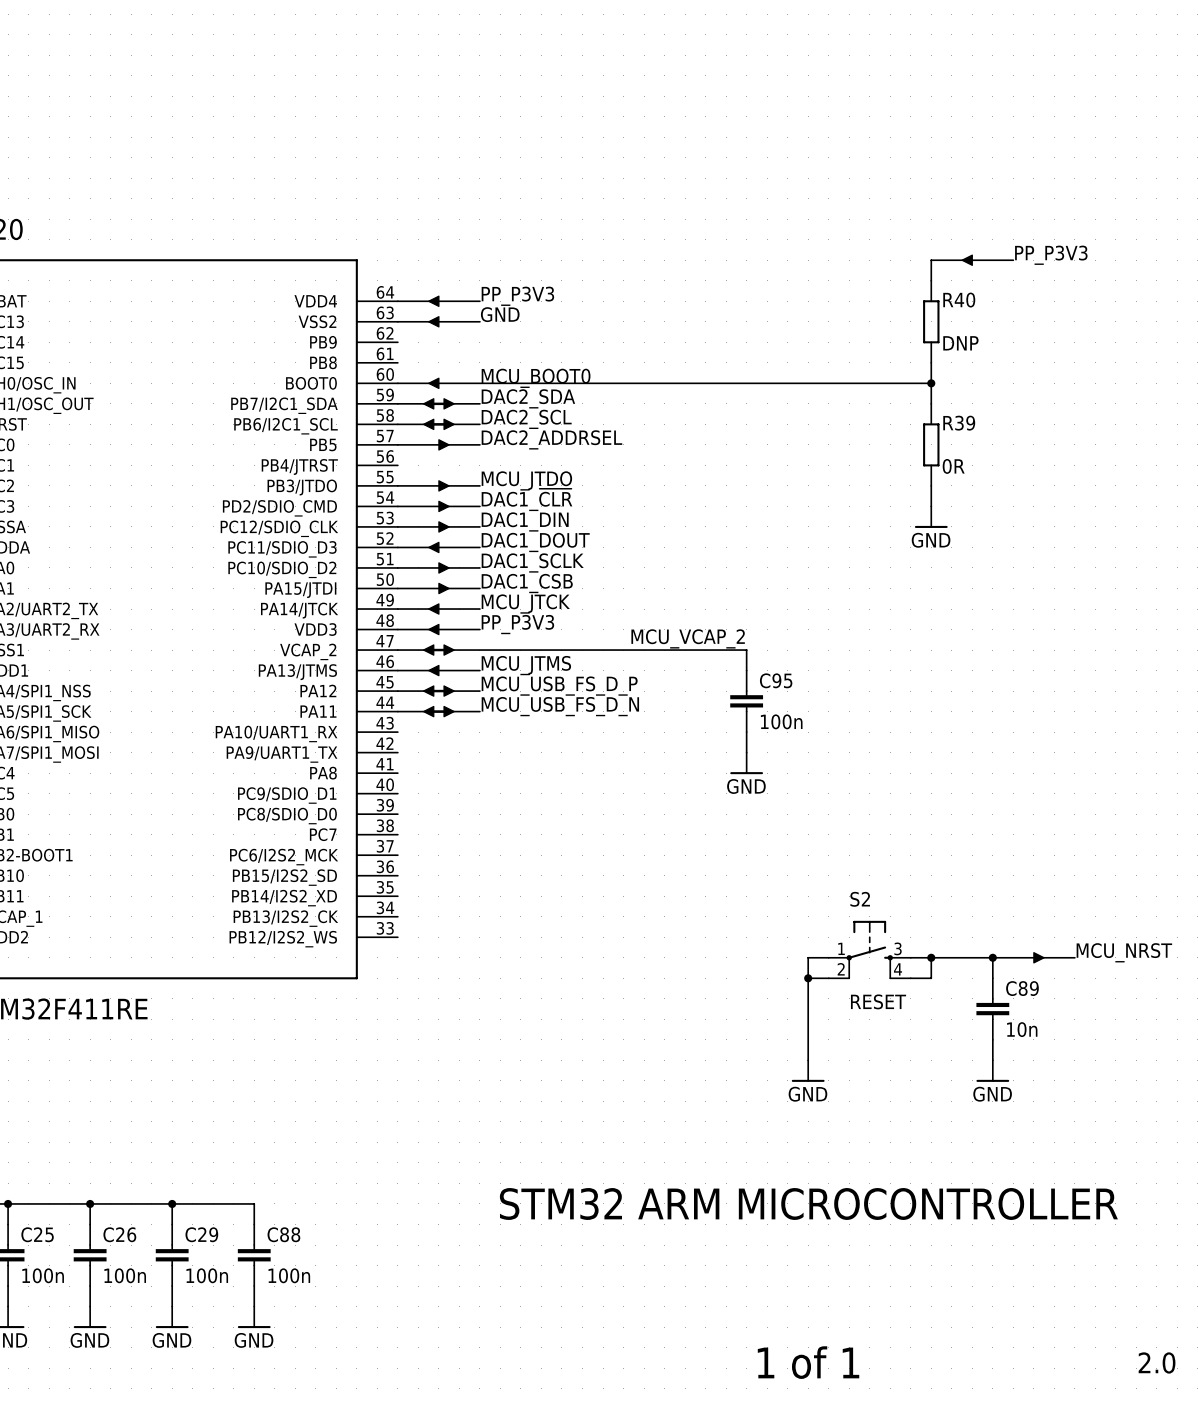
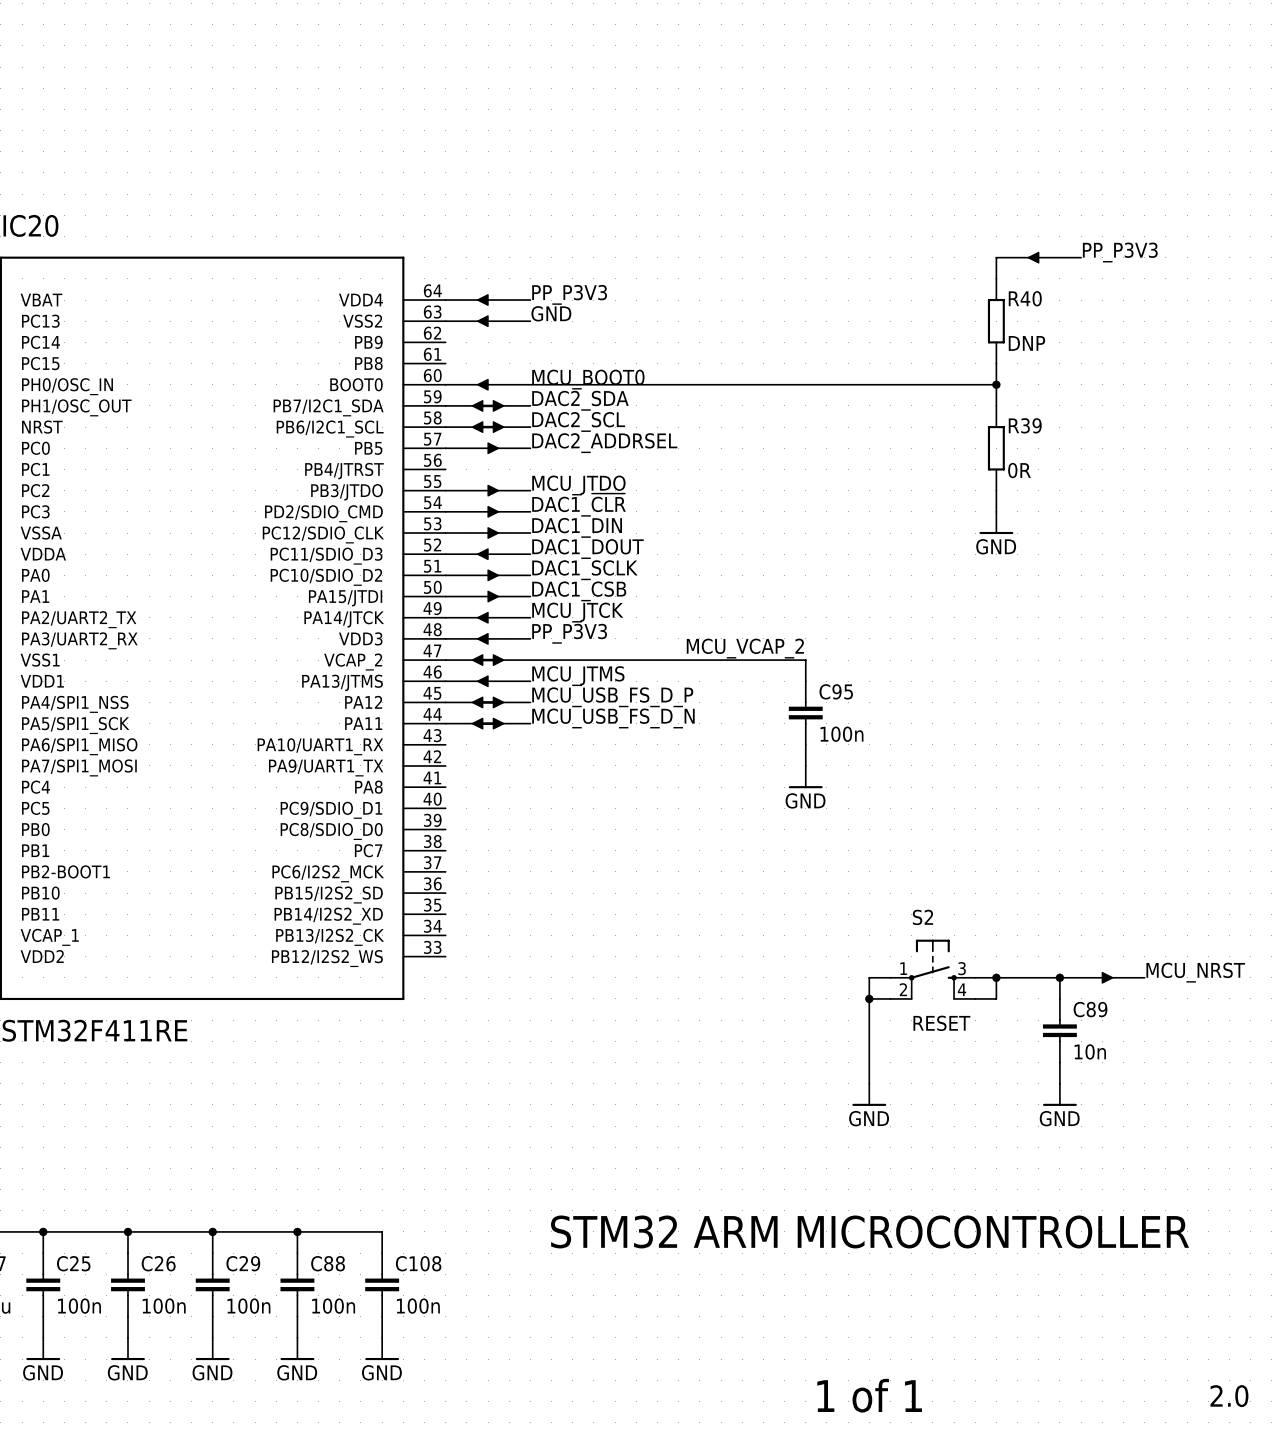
wire: none -> (297, 1231) (382, 1231) (382, 1253)
junction: none -> (297, 1231)
C108: none -> 100n (382, 1284)
wire: none -> (382, 1316) (382, 1337)
power symbol: none -> GND (382, 1348)

